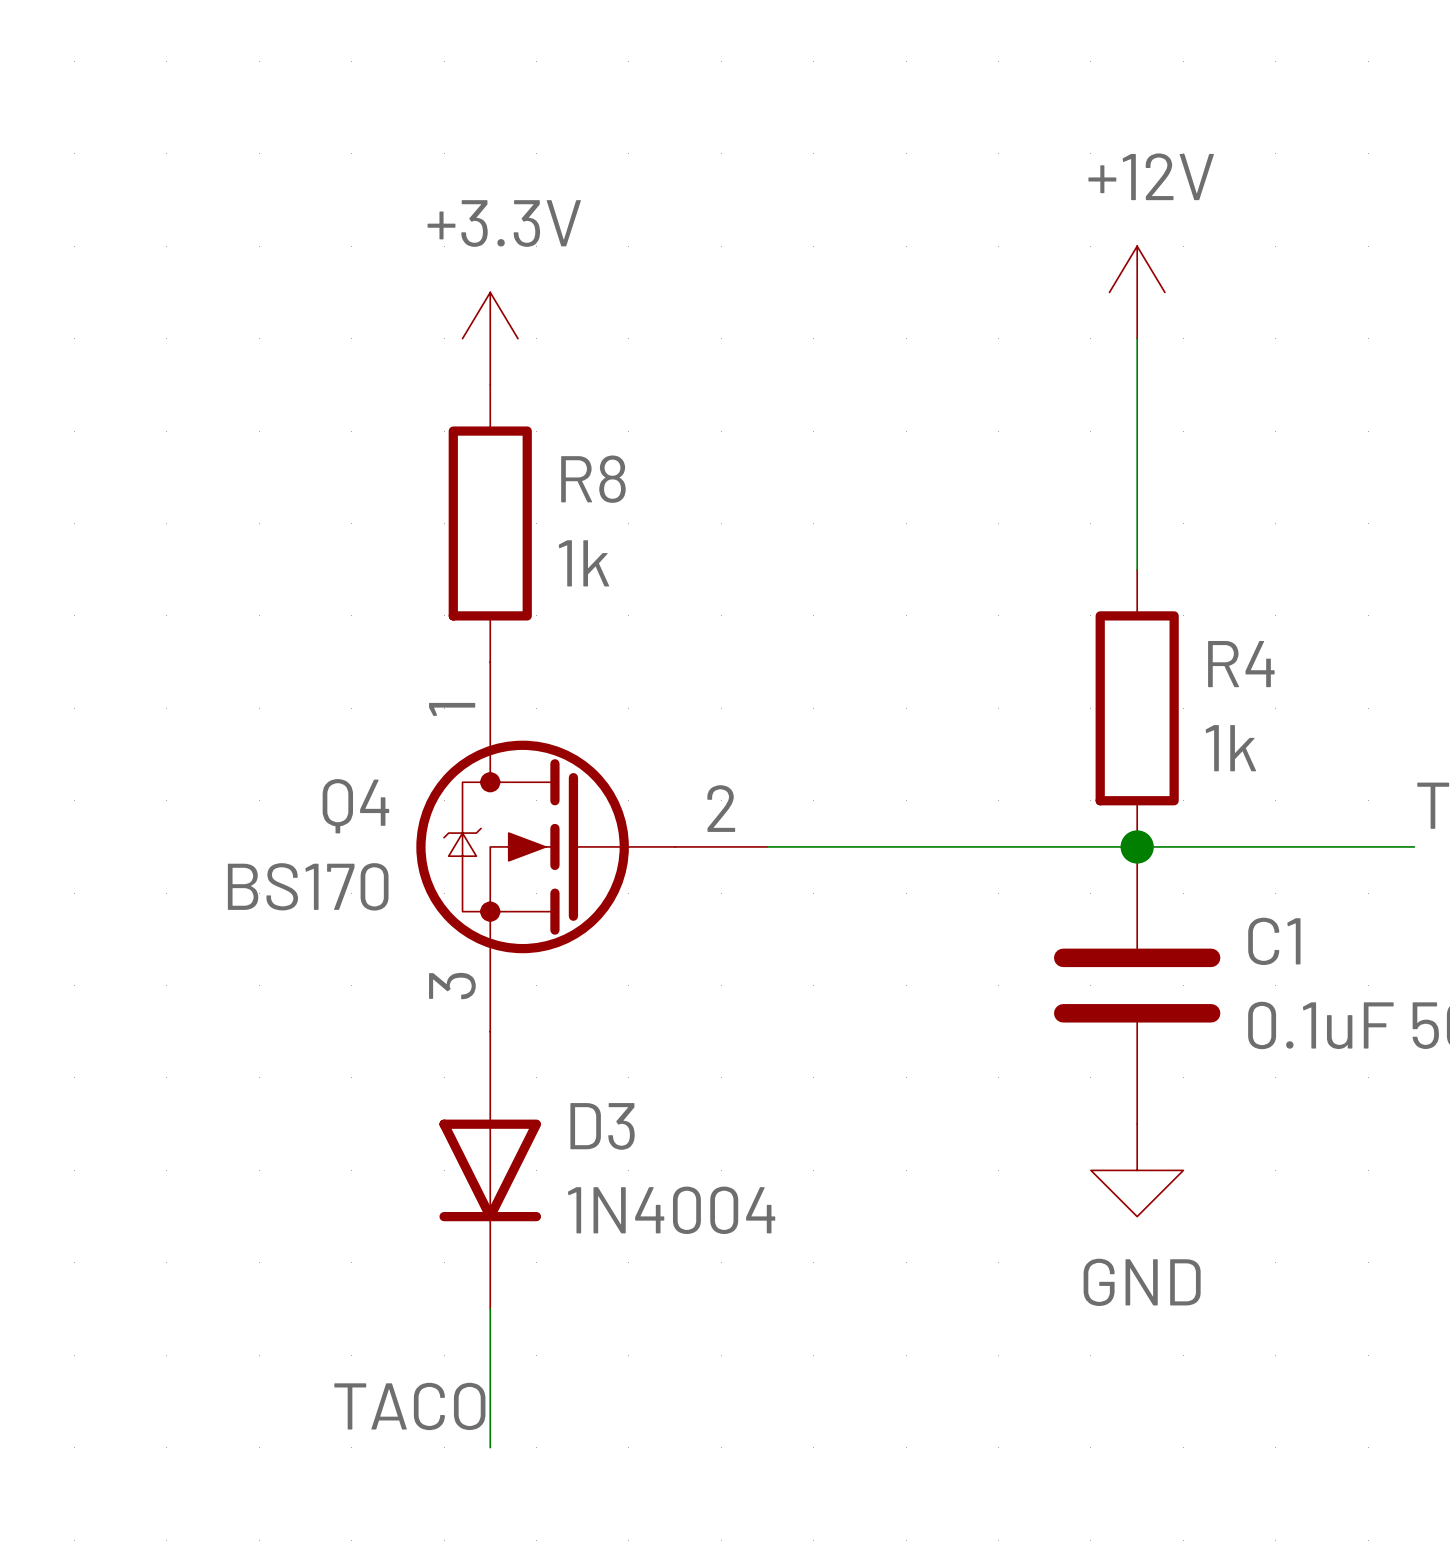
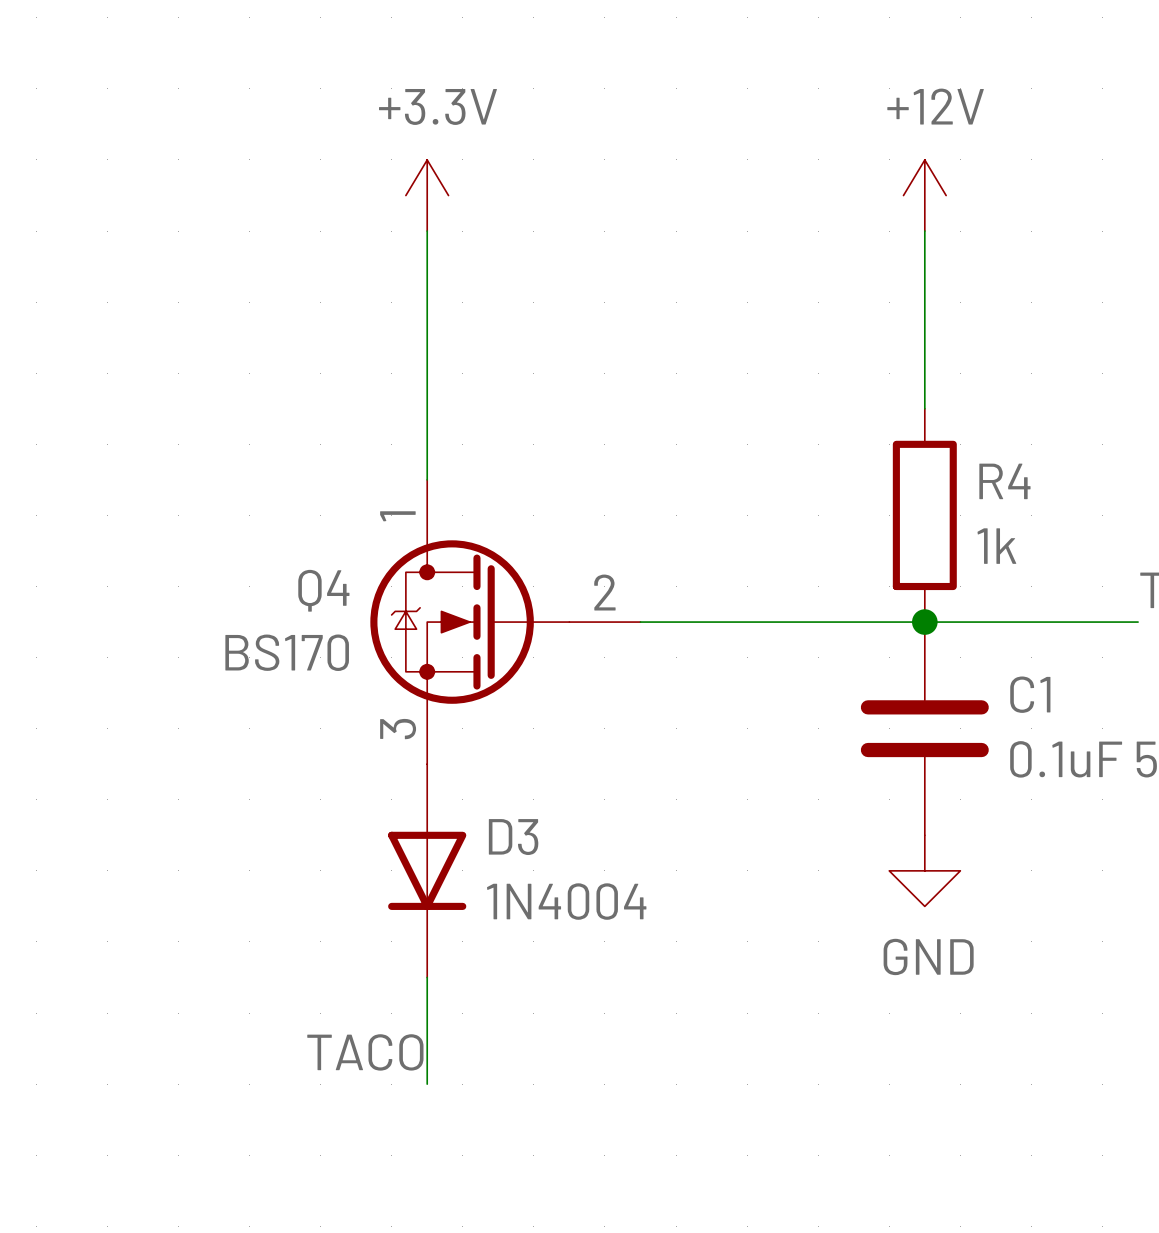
wire: none -> (427, 231) (427, 479)
power symbol position: +3.3V (490, 338) -> +3.3V (427, 195)
R8: 1k (490, 523) -> none

